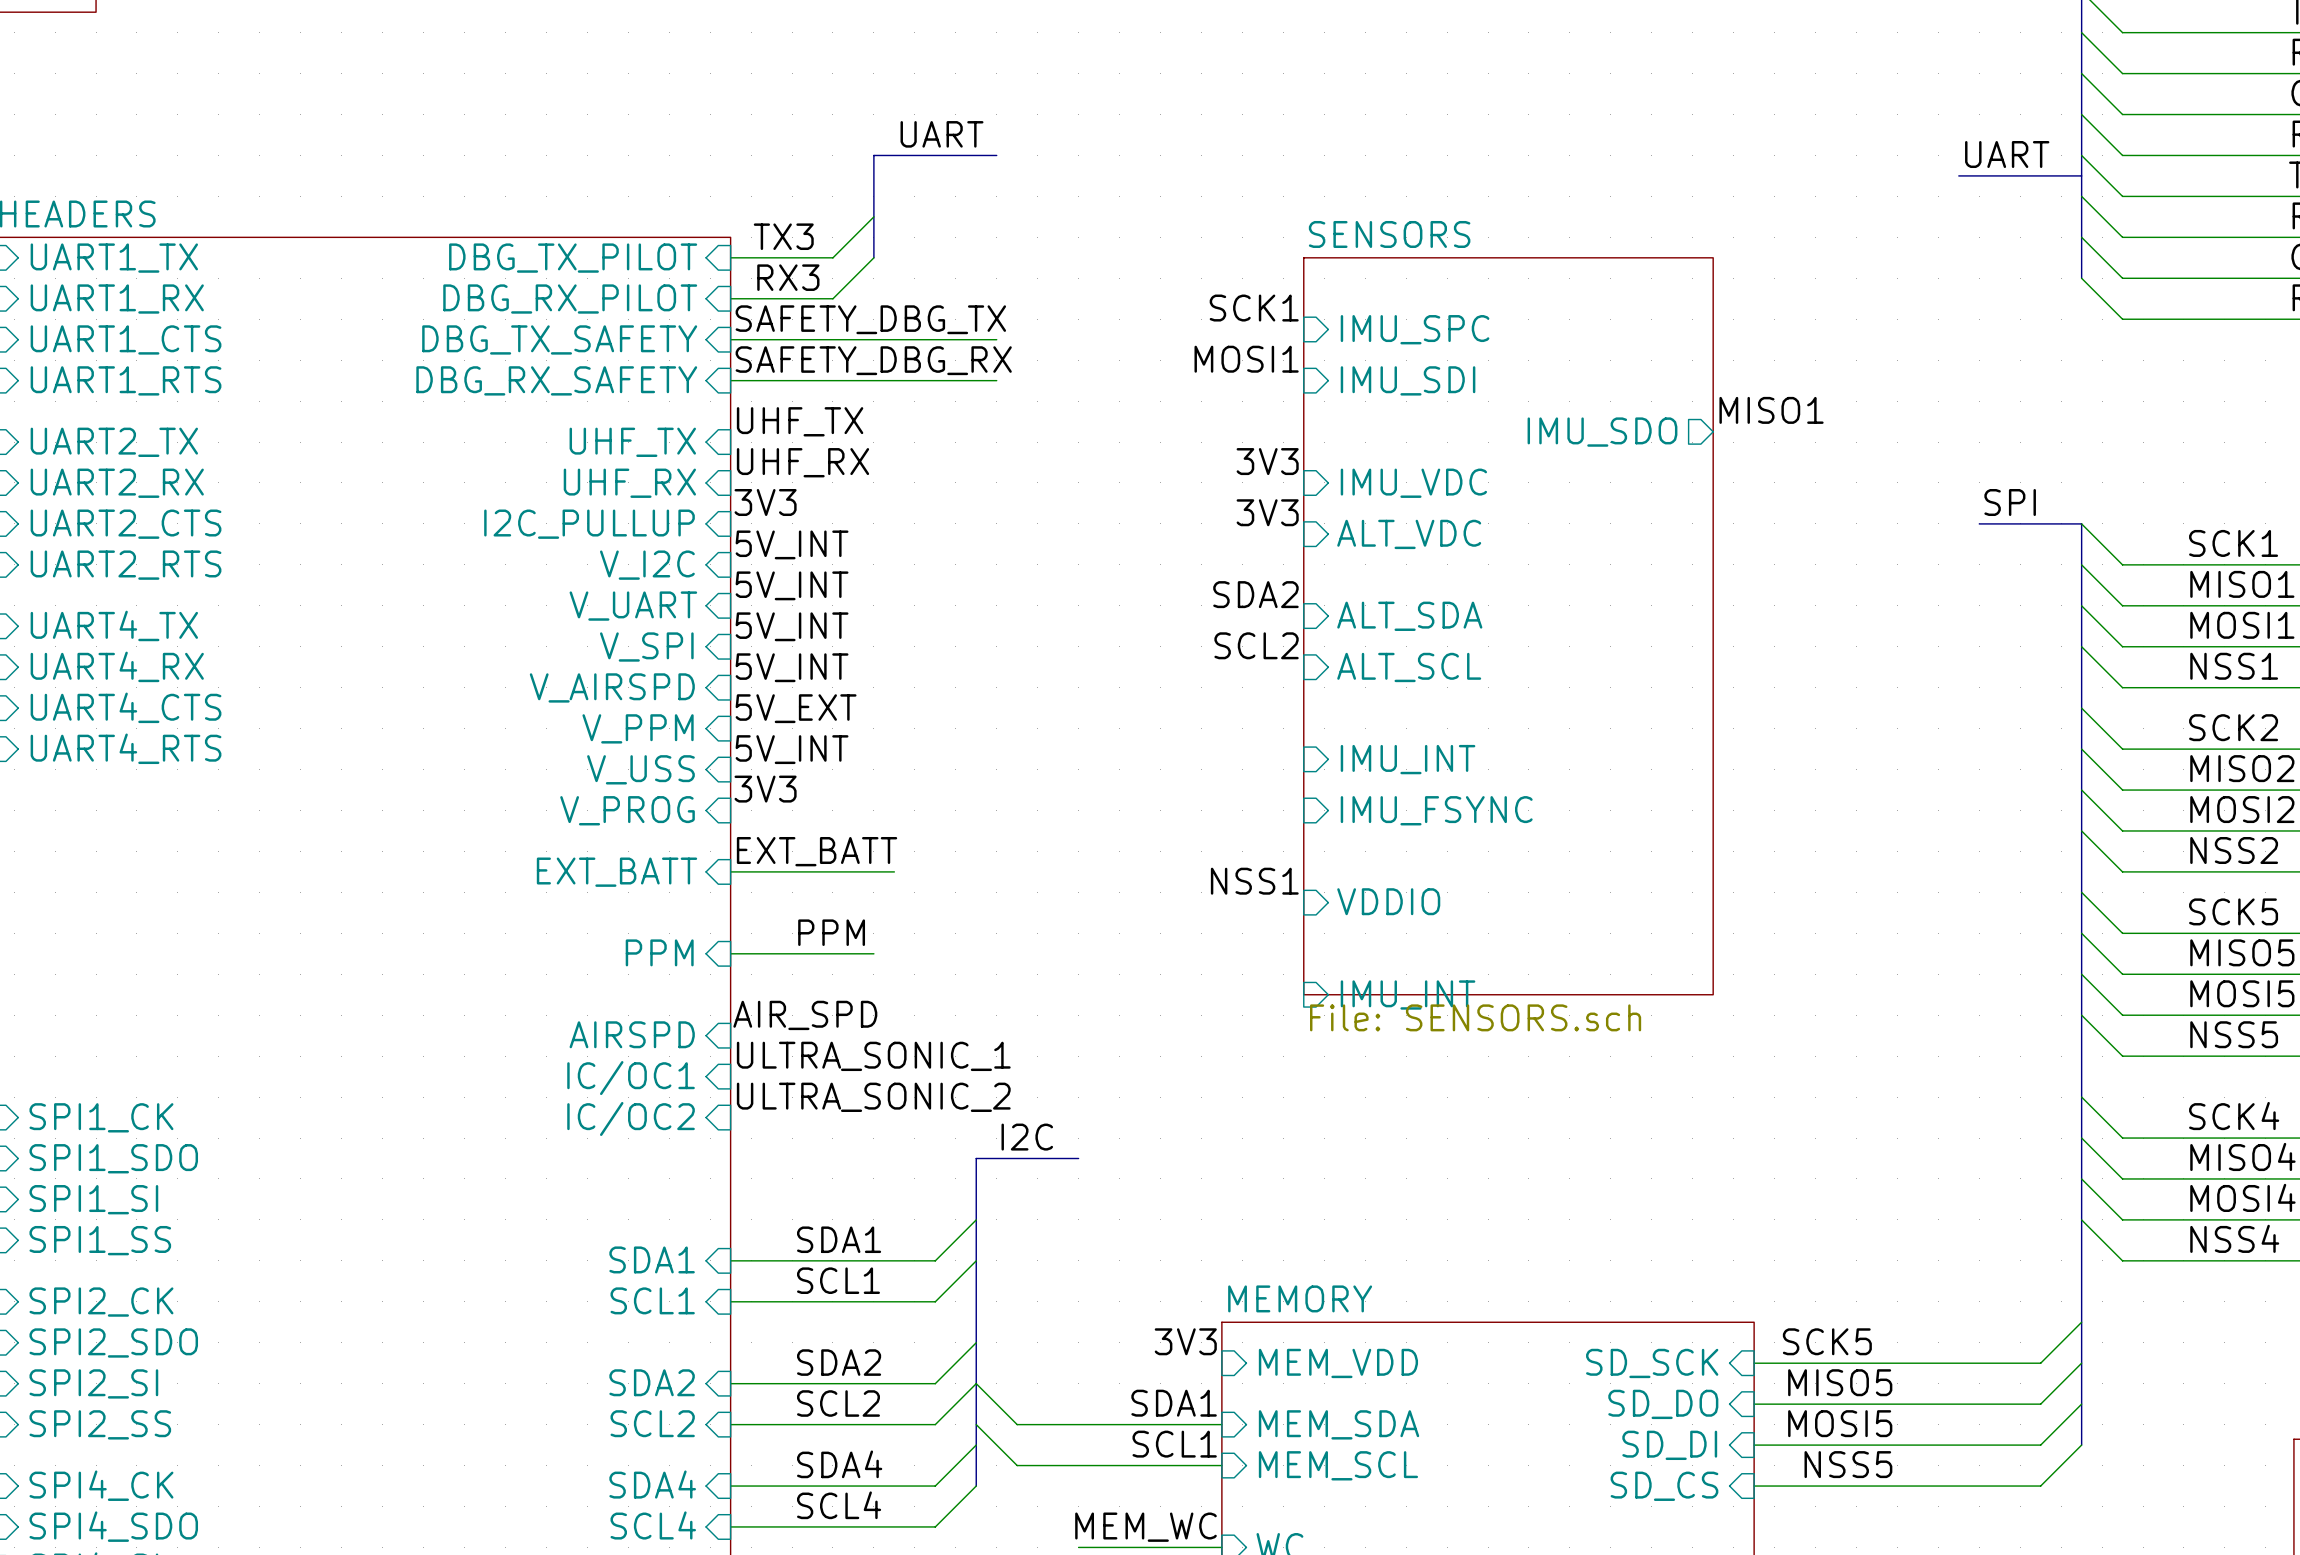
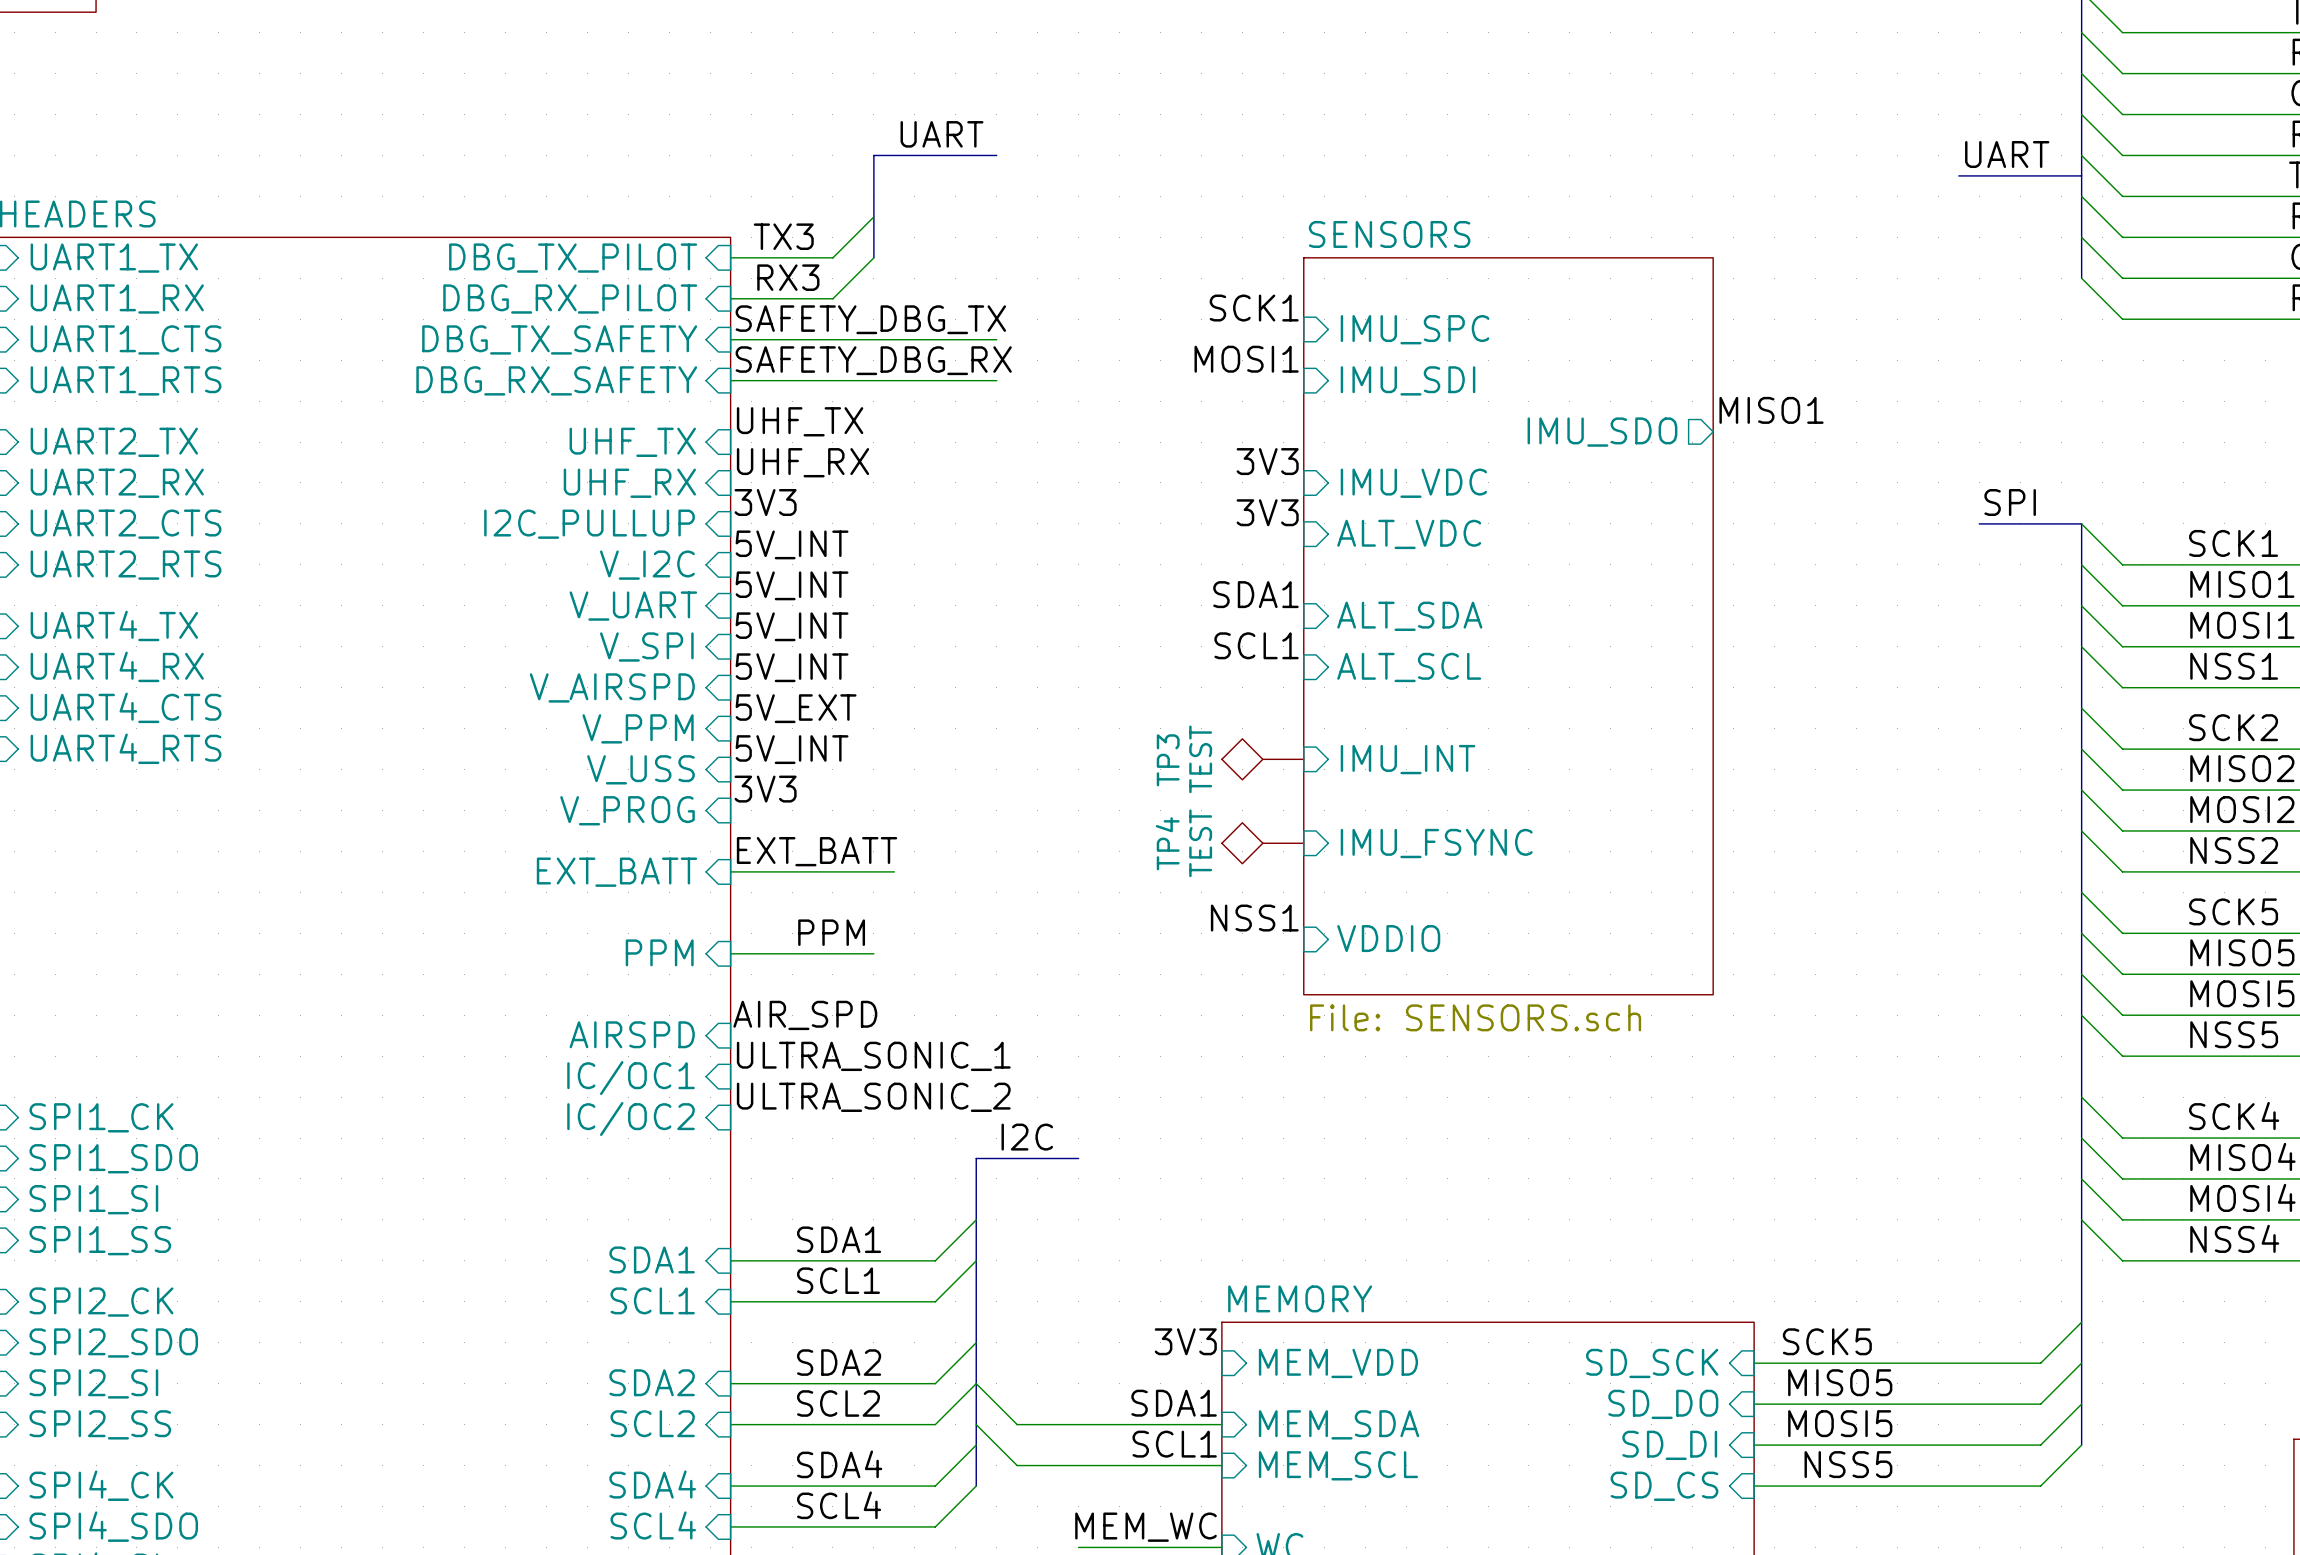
label: SDA2 (1255, 594) -> SDA1 (1255, 594)
label: SCL2 (1256, 645) -> SCL1 (1256, 645)
TP3: none -> TEST (1262, 759)
sheet pin position: IMU_FSYNC (1436, 810) -> IMU_FSYNC (1436, 843)
TP4: none -> TEST (1262, 843)
label position: NSS1 (1254, 881) -> NSS1 (1254, 918)
sheet pin position: VDDIO (1388, 901) -> VDDIO (1388, 938)
sheet pin: IMU_INT (1408, 994) -> none

